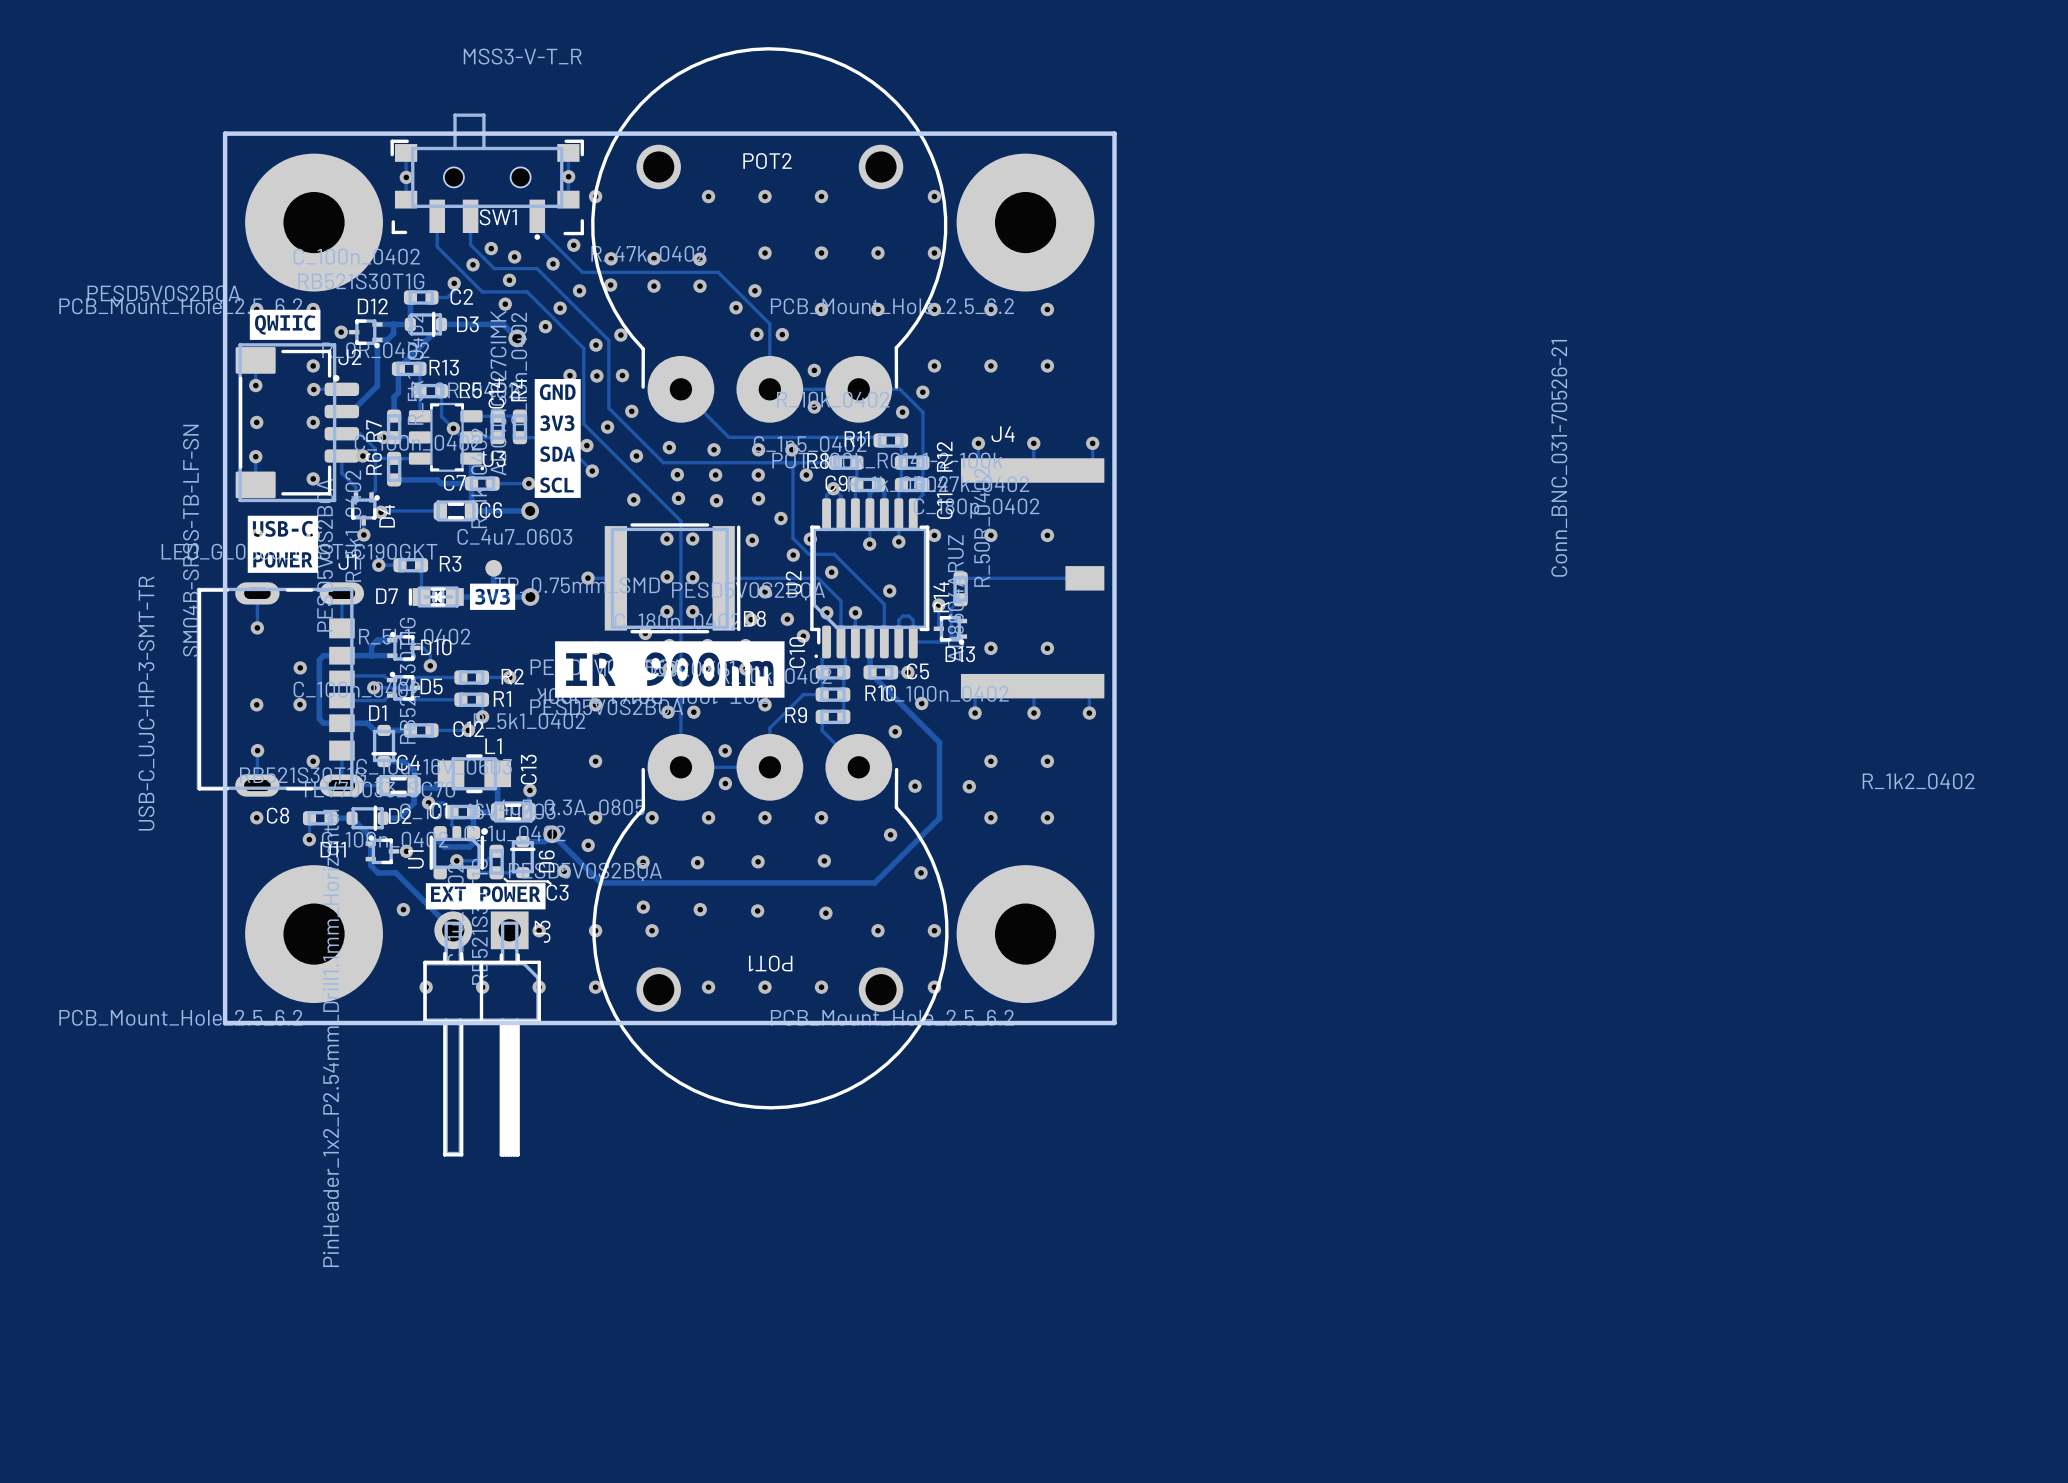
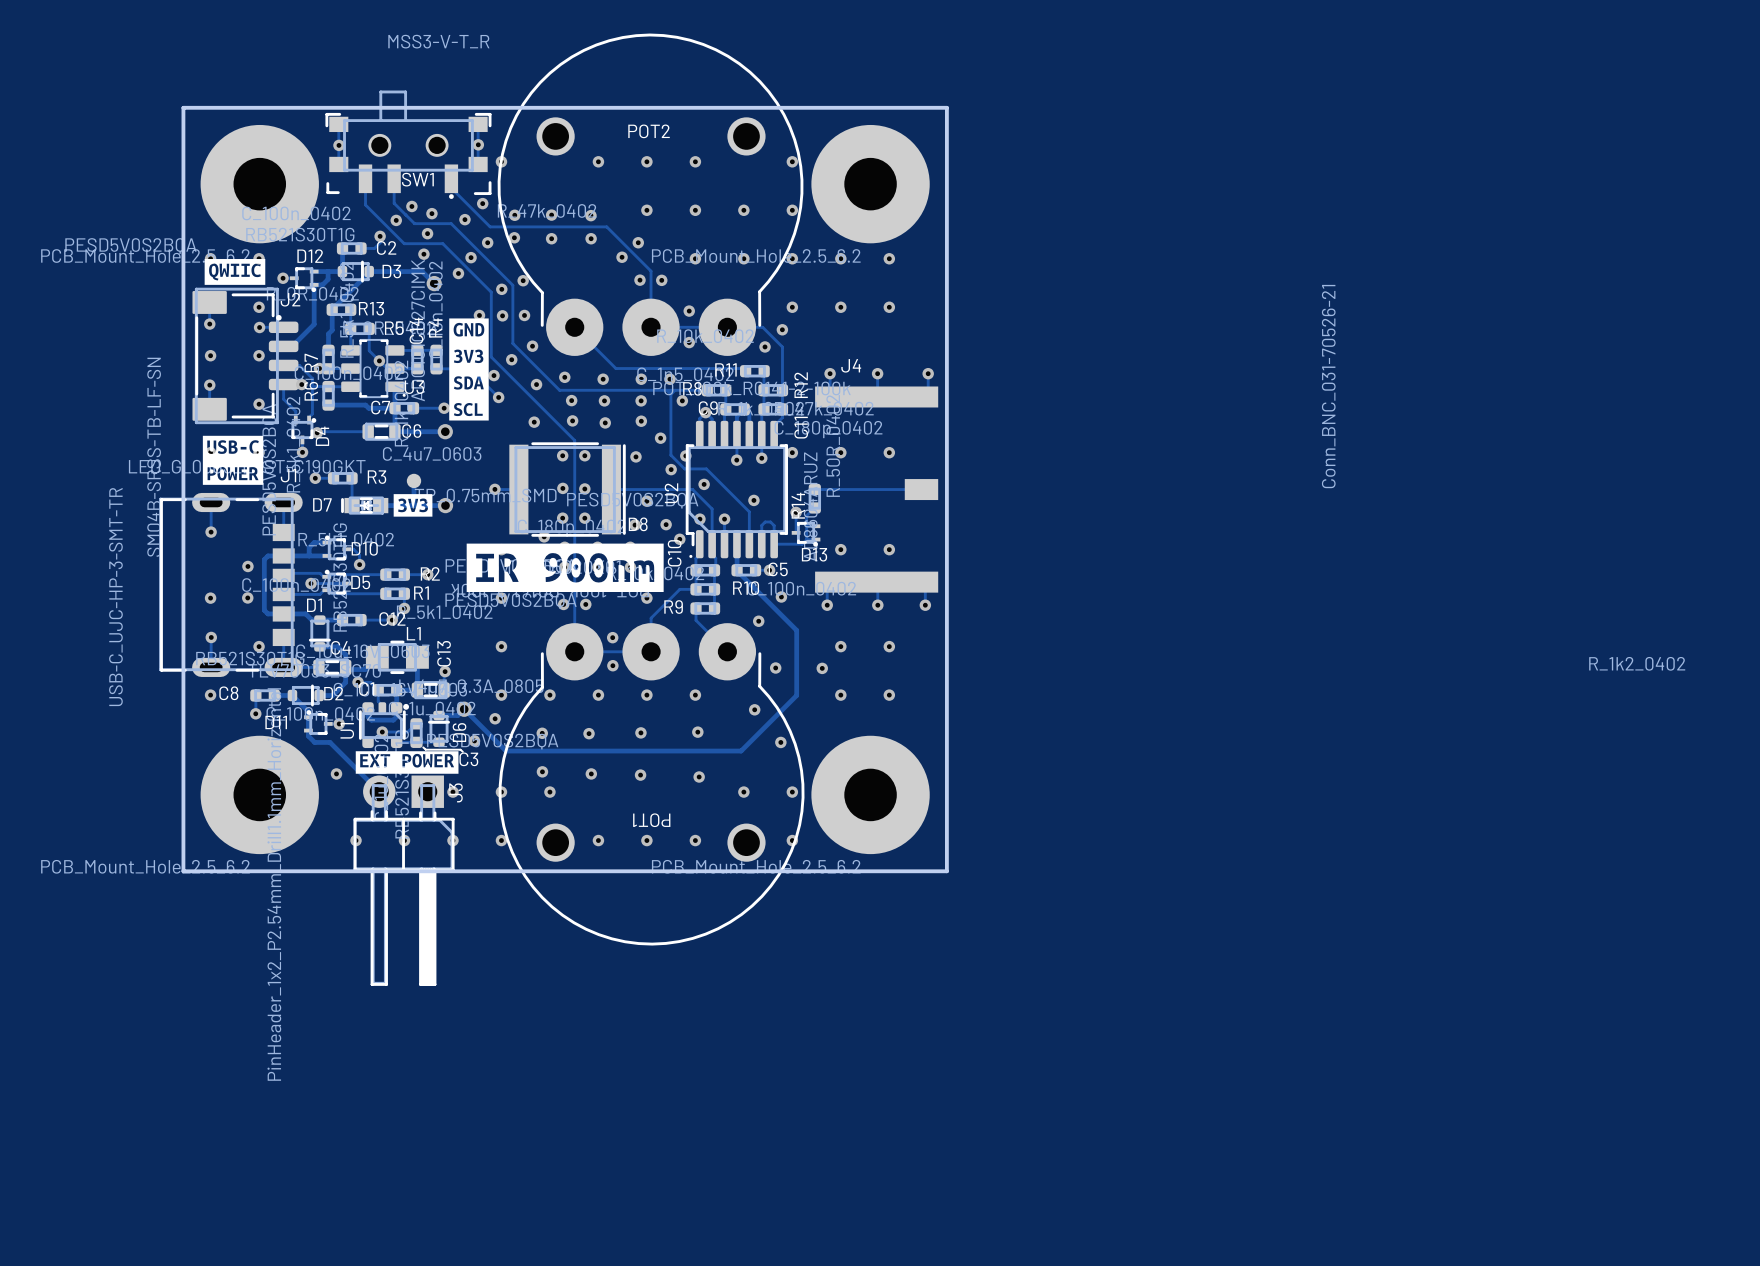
SW1 footprint: [390, 113, 584, 240] -> [325, 90, 492, 199]

